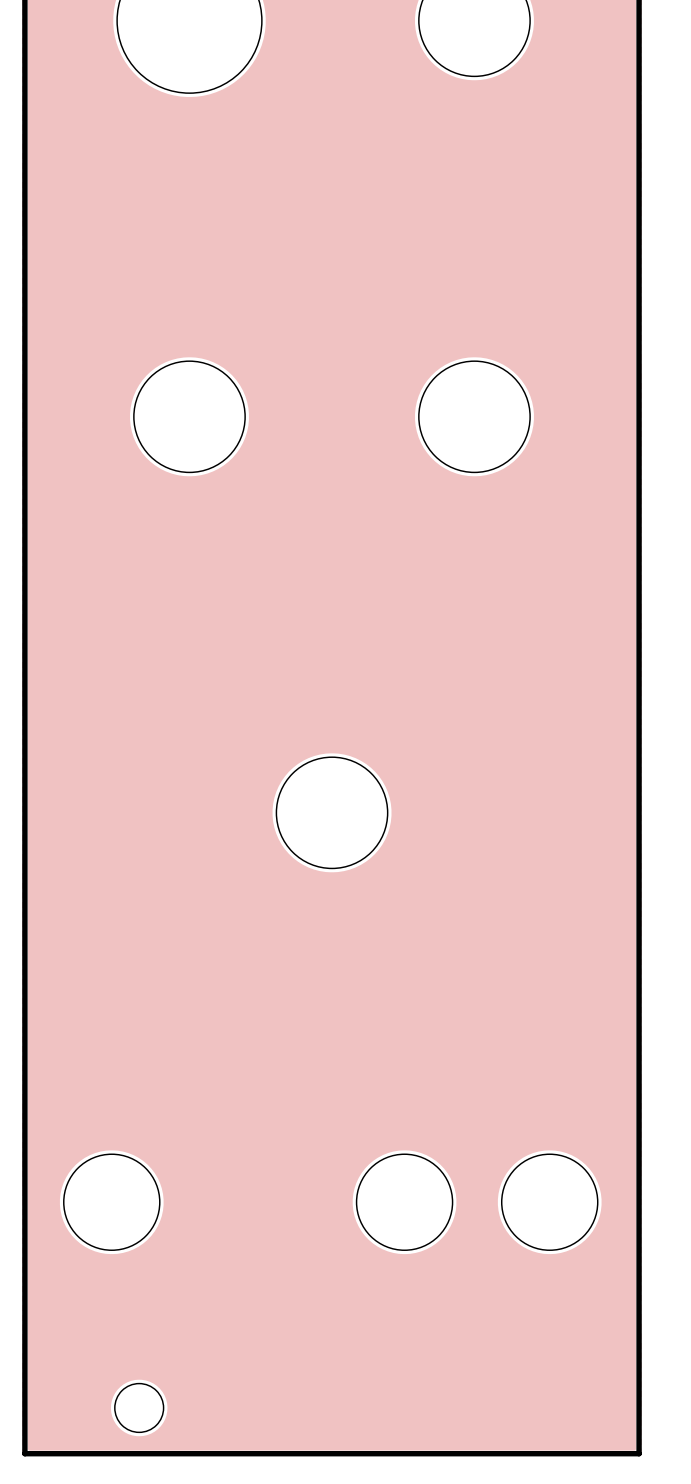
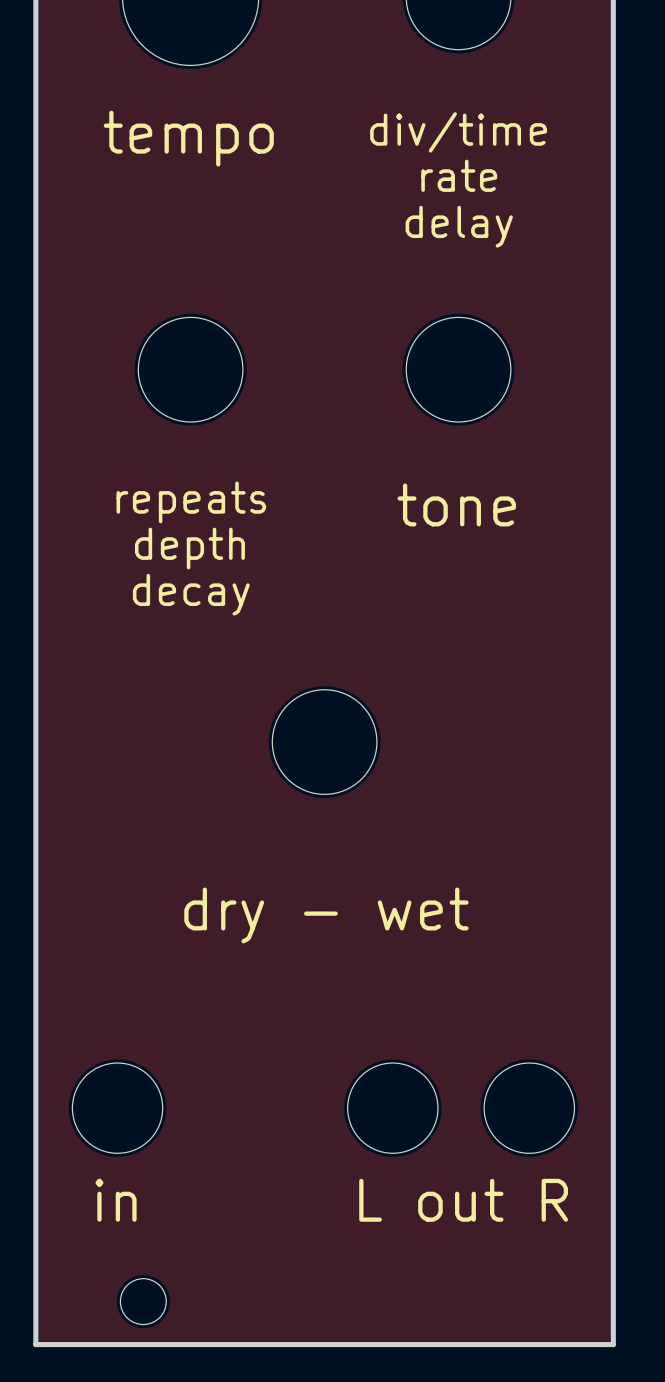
text: none -> div/time (458, 132)
text: none -> tempo (188, 138)
text: none -> rate (459, 175)
text: none -> delay (459, 226)
text: none -> repeats (191, 502)
text: none -> tone (456, 504)
text: none -> depth (189, 548)
text: none -> decay (191, 594)
text: none -> dry - wet (326, 915)
text: none -> in (116, 1200)
text: none -> L out R (463, 1200)

